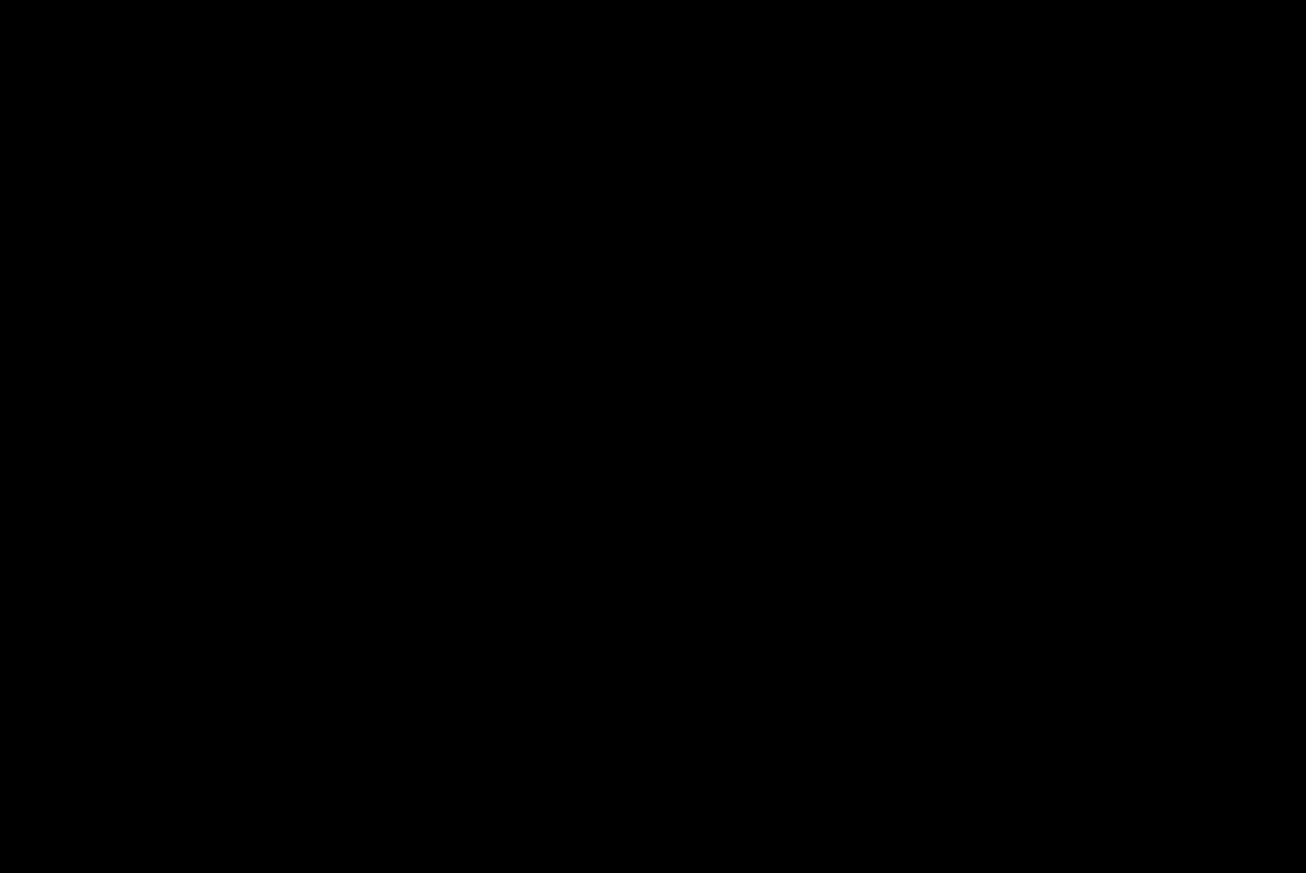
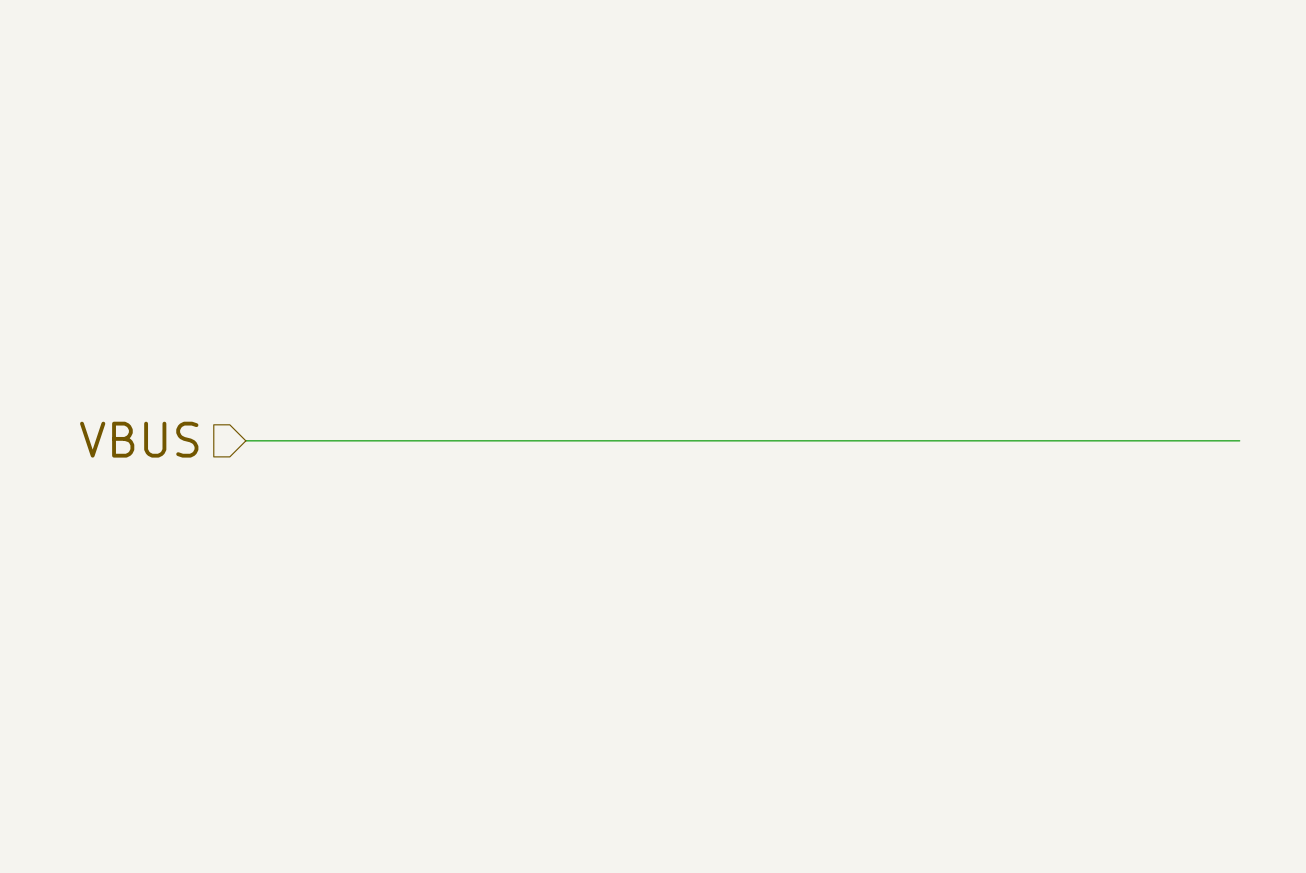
hierarchical label: none -> VBUS (139, 439)
wire: none -> (245, 440) (1239, 440)

